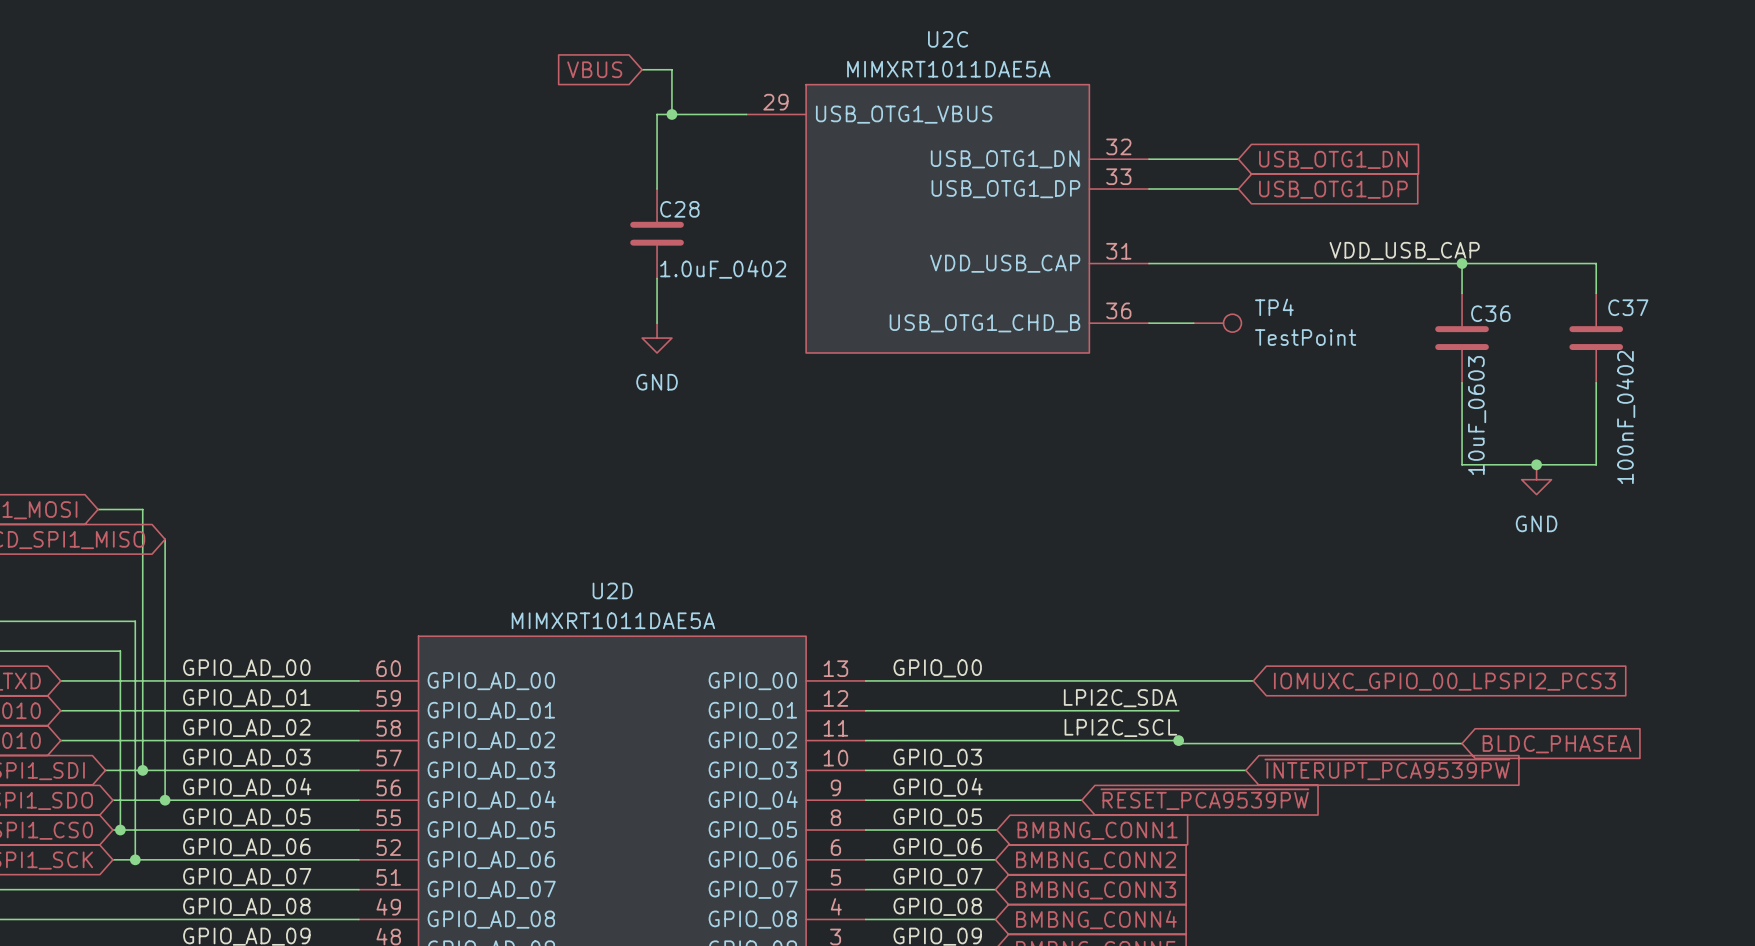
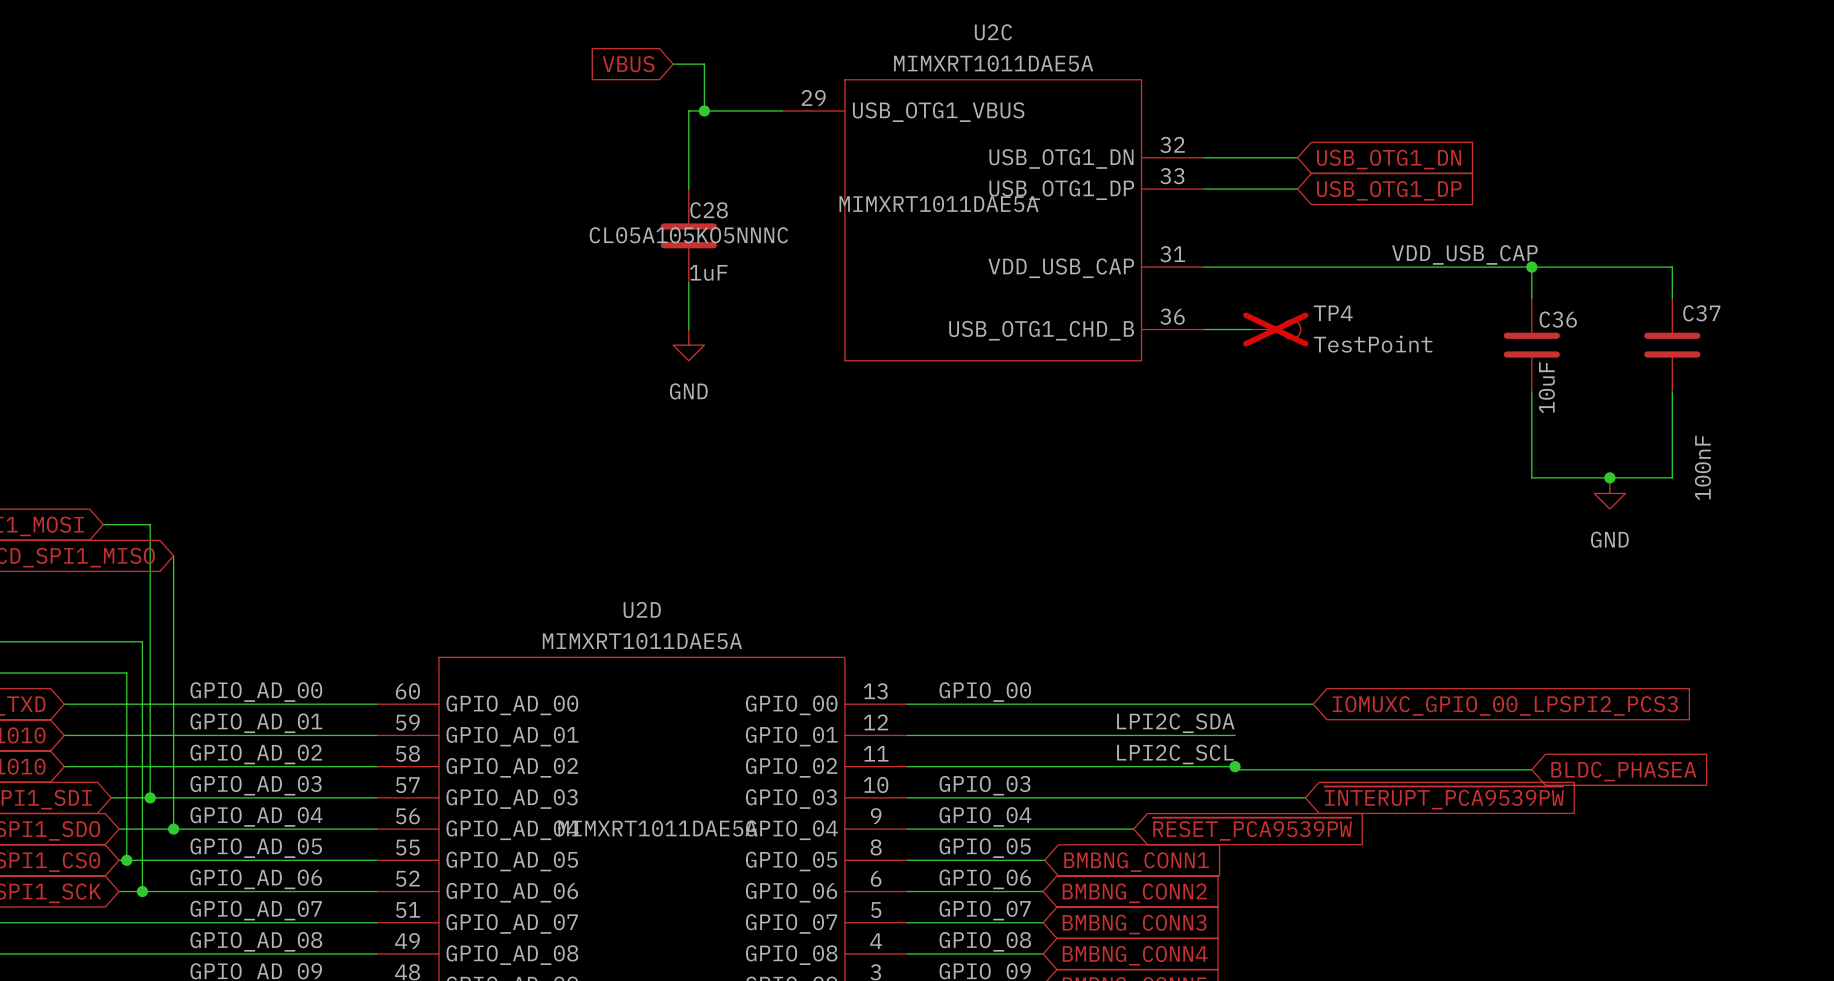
U2C text: none -> MIMXRT1011DAE5A (939, 204)
C28 text: none -> CL05A105KO5NNNC (688, 235)
C28 value: 1.0uF_0402 (723, 269) -> 1uF (708, 272)
TP4 do-not-place cross: none -> (1275, 329)
C36 value: 10uF_0603 (1477, 415) -> 10uF (1546, 387)
C37 value: 100nF_0402 (1625, 417) -> 100nF (1702, 467)
U2D text: none -> MIMXRT1011DAE5A (658, 828)

